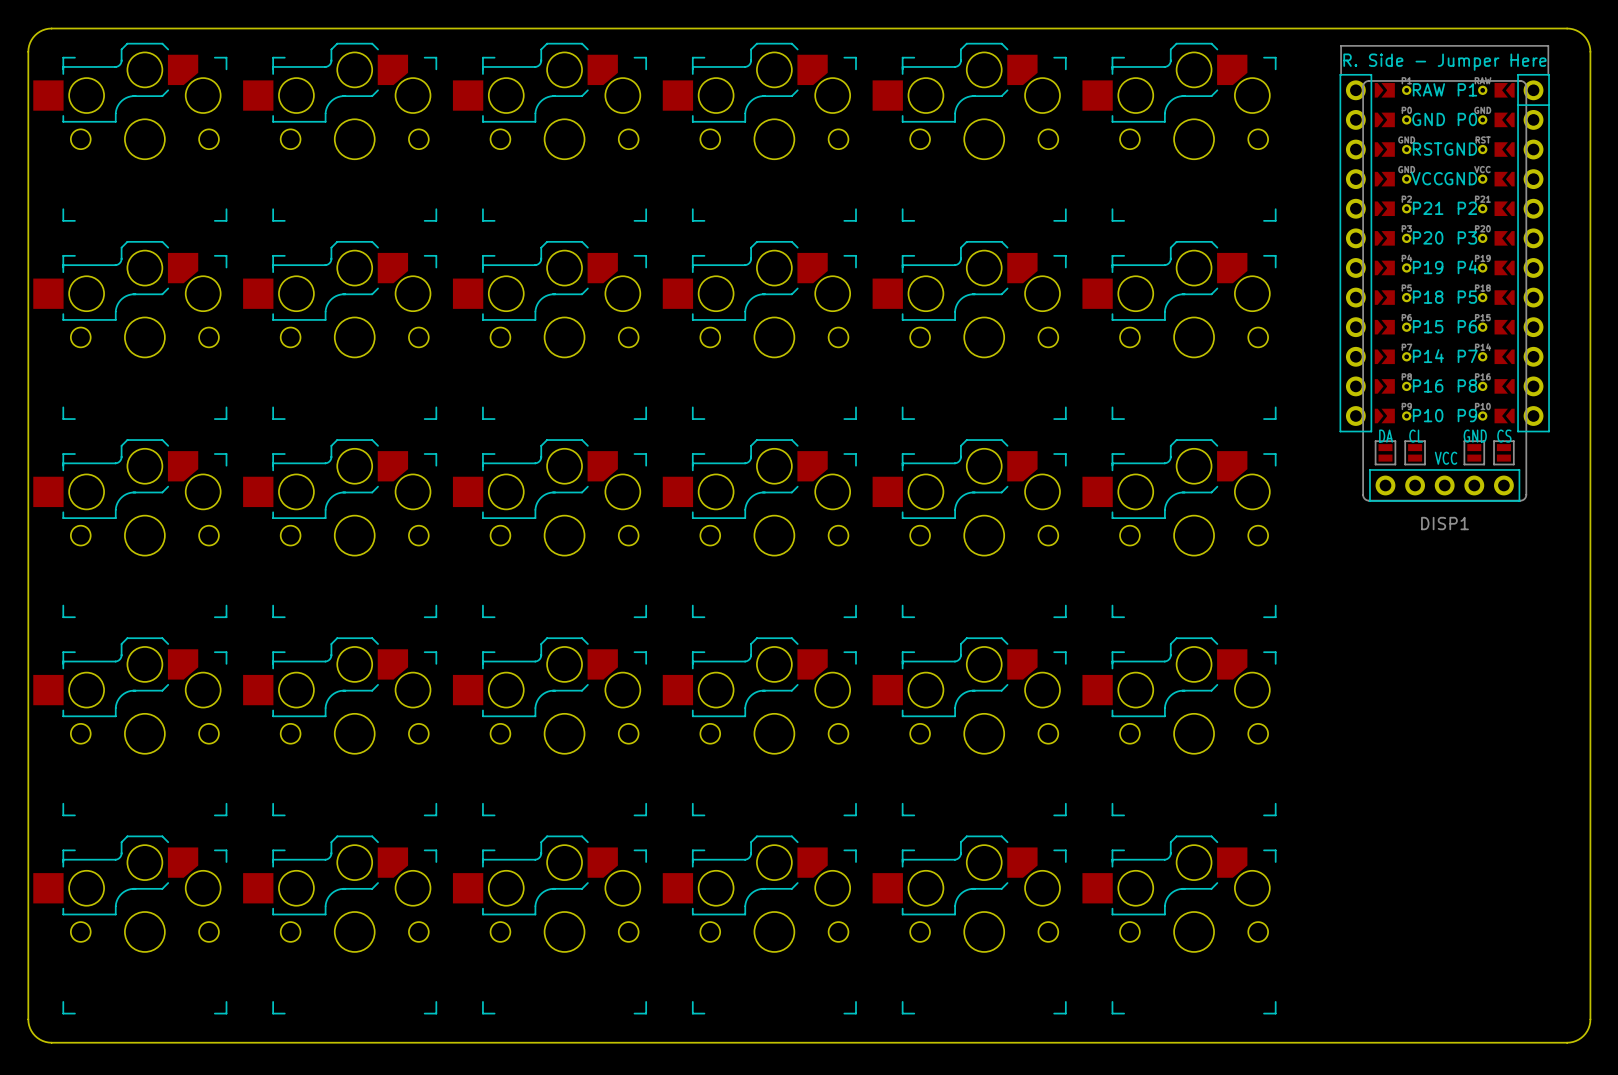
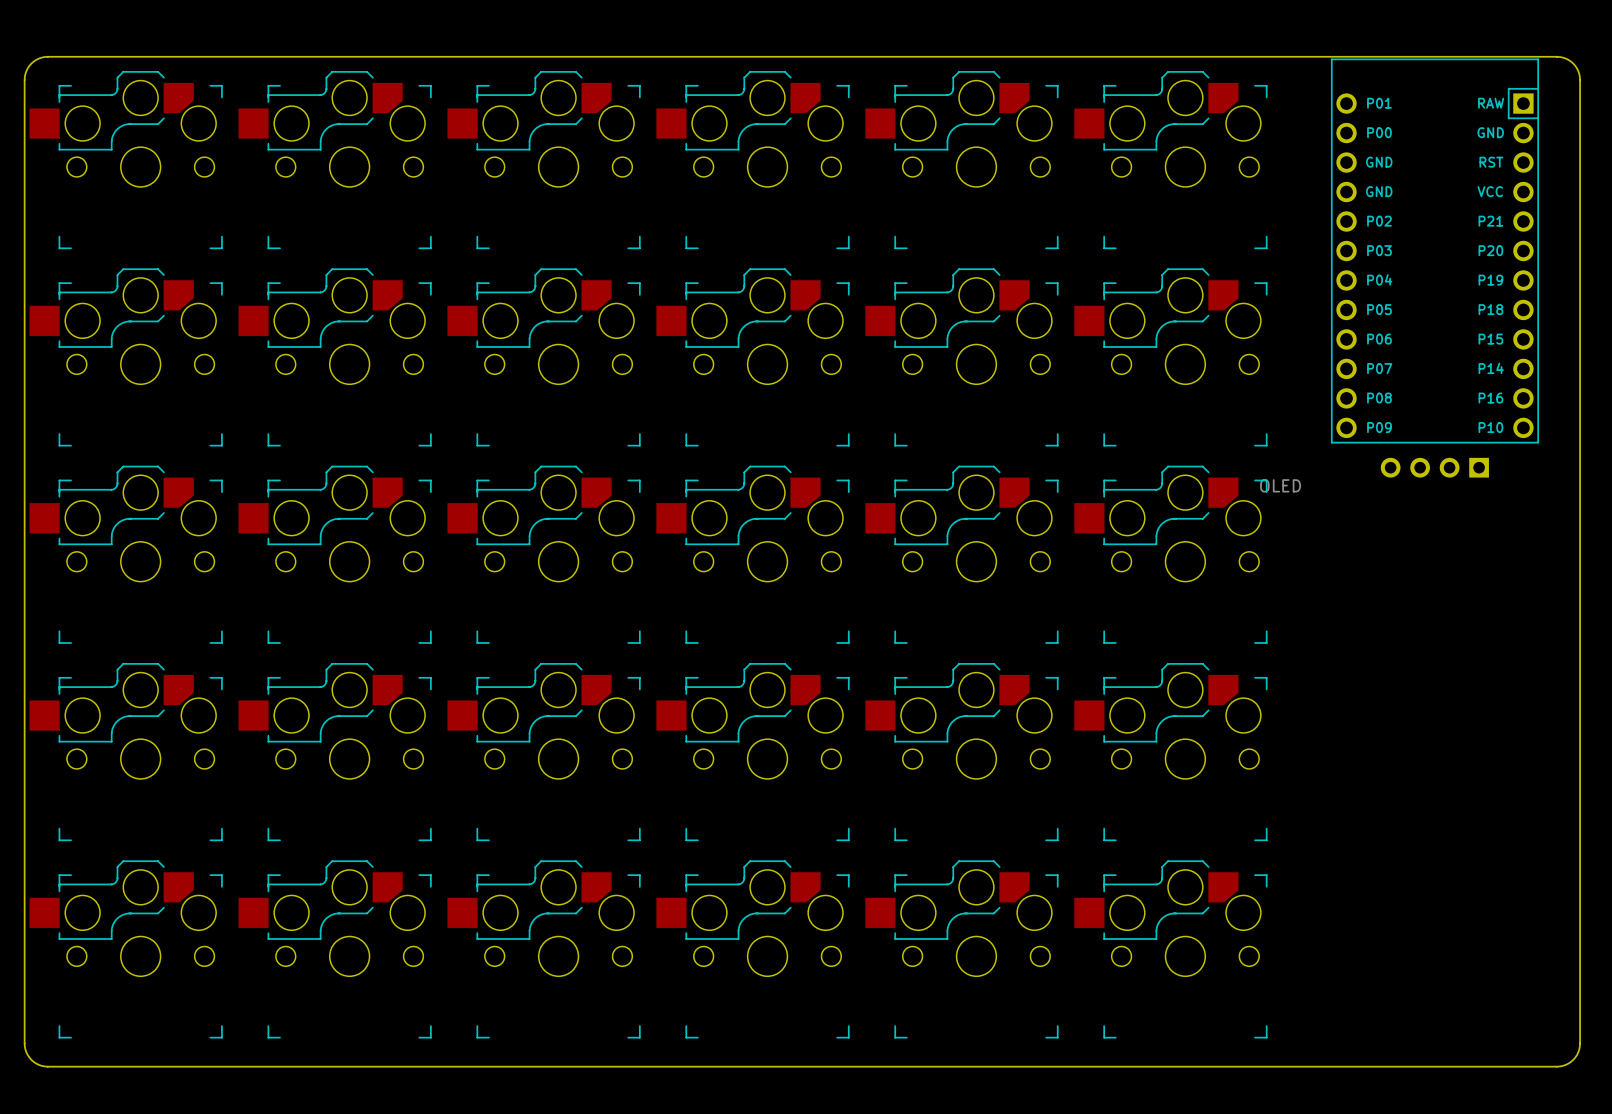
part: none -> (1434, 250)
part: (1444, 238) -> none
DISP1: (1444, 290) -> none
part: none -> OLED (1434, 467)

